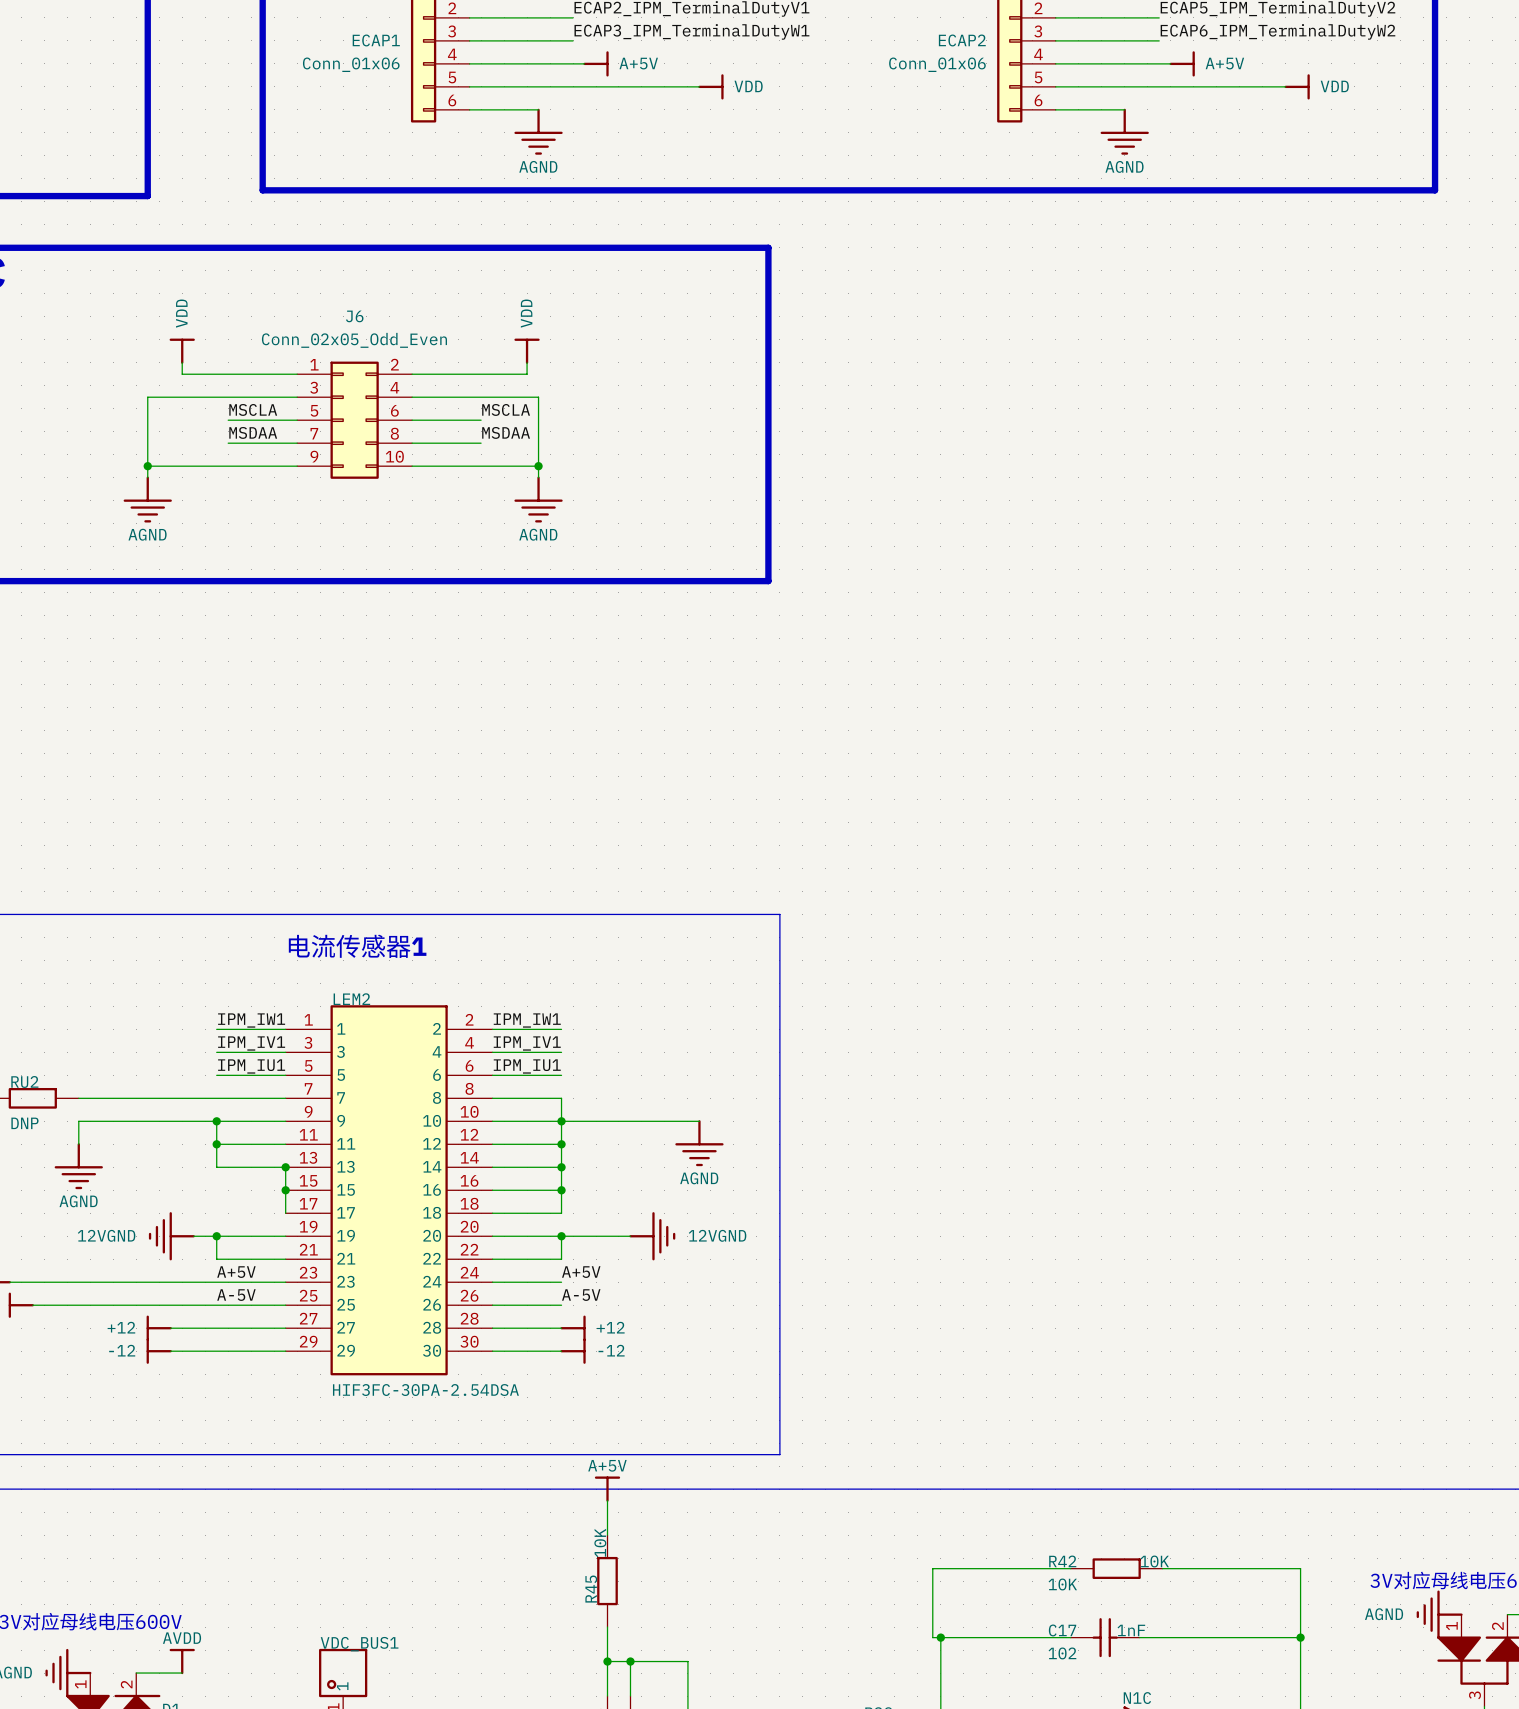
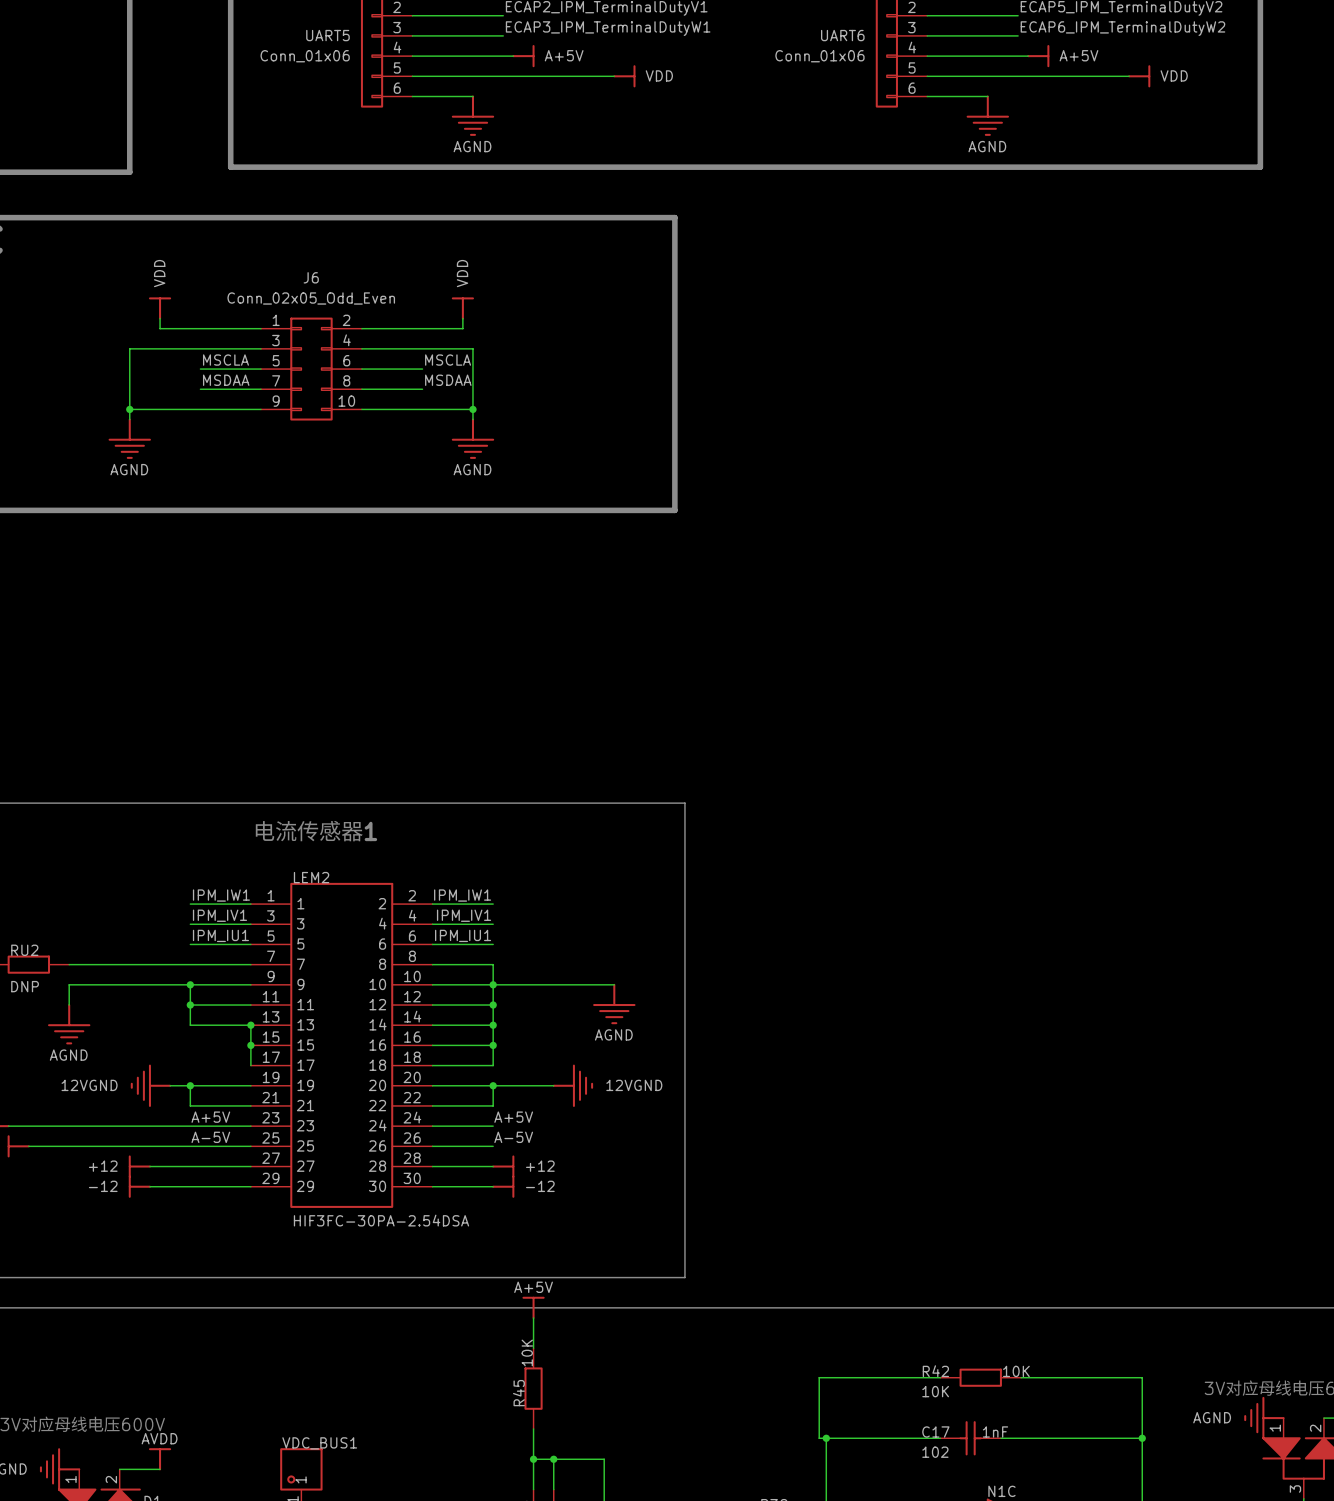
ECAP1 name: ECAP1 (376, 40) -> UART5 (327, 35)
ECAP2 name: ECAP2 (962, 40) -> UART6 (842, 35)

